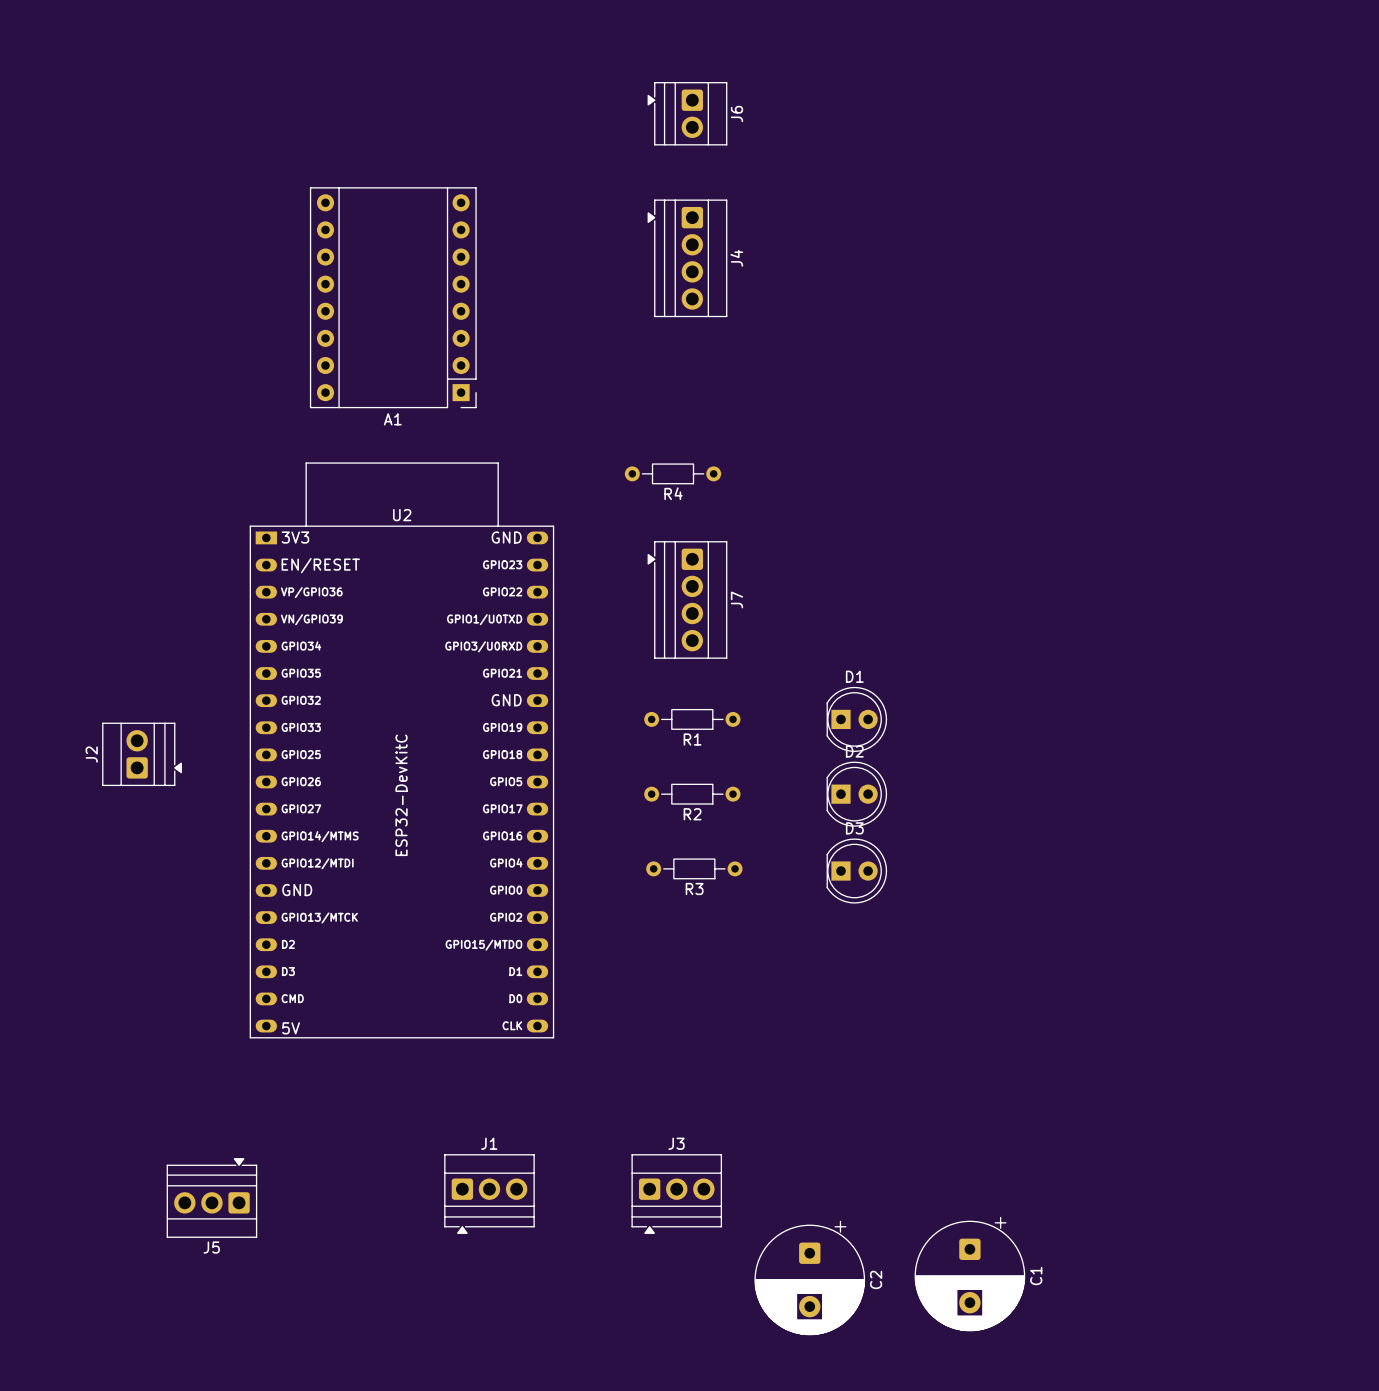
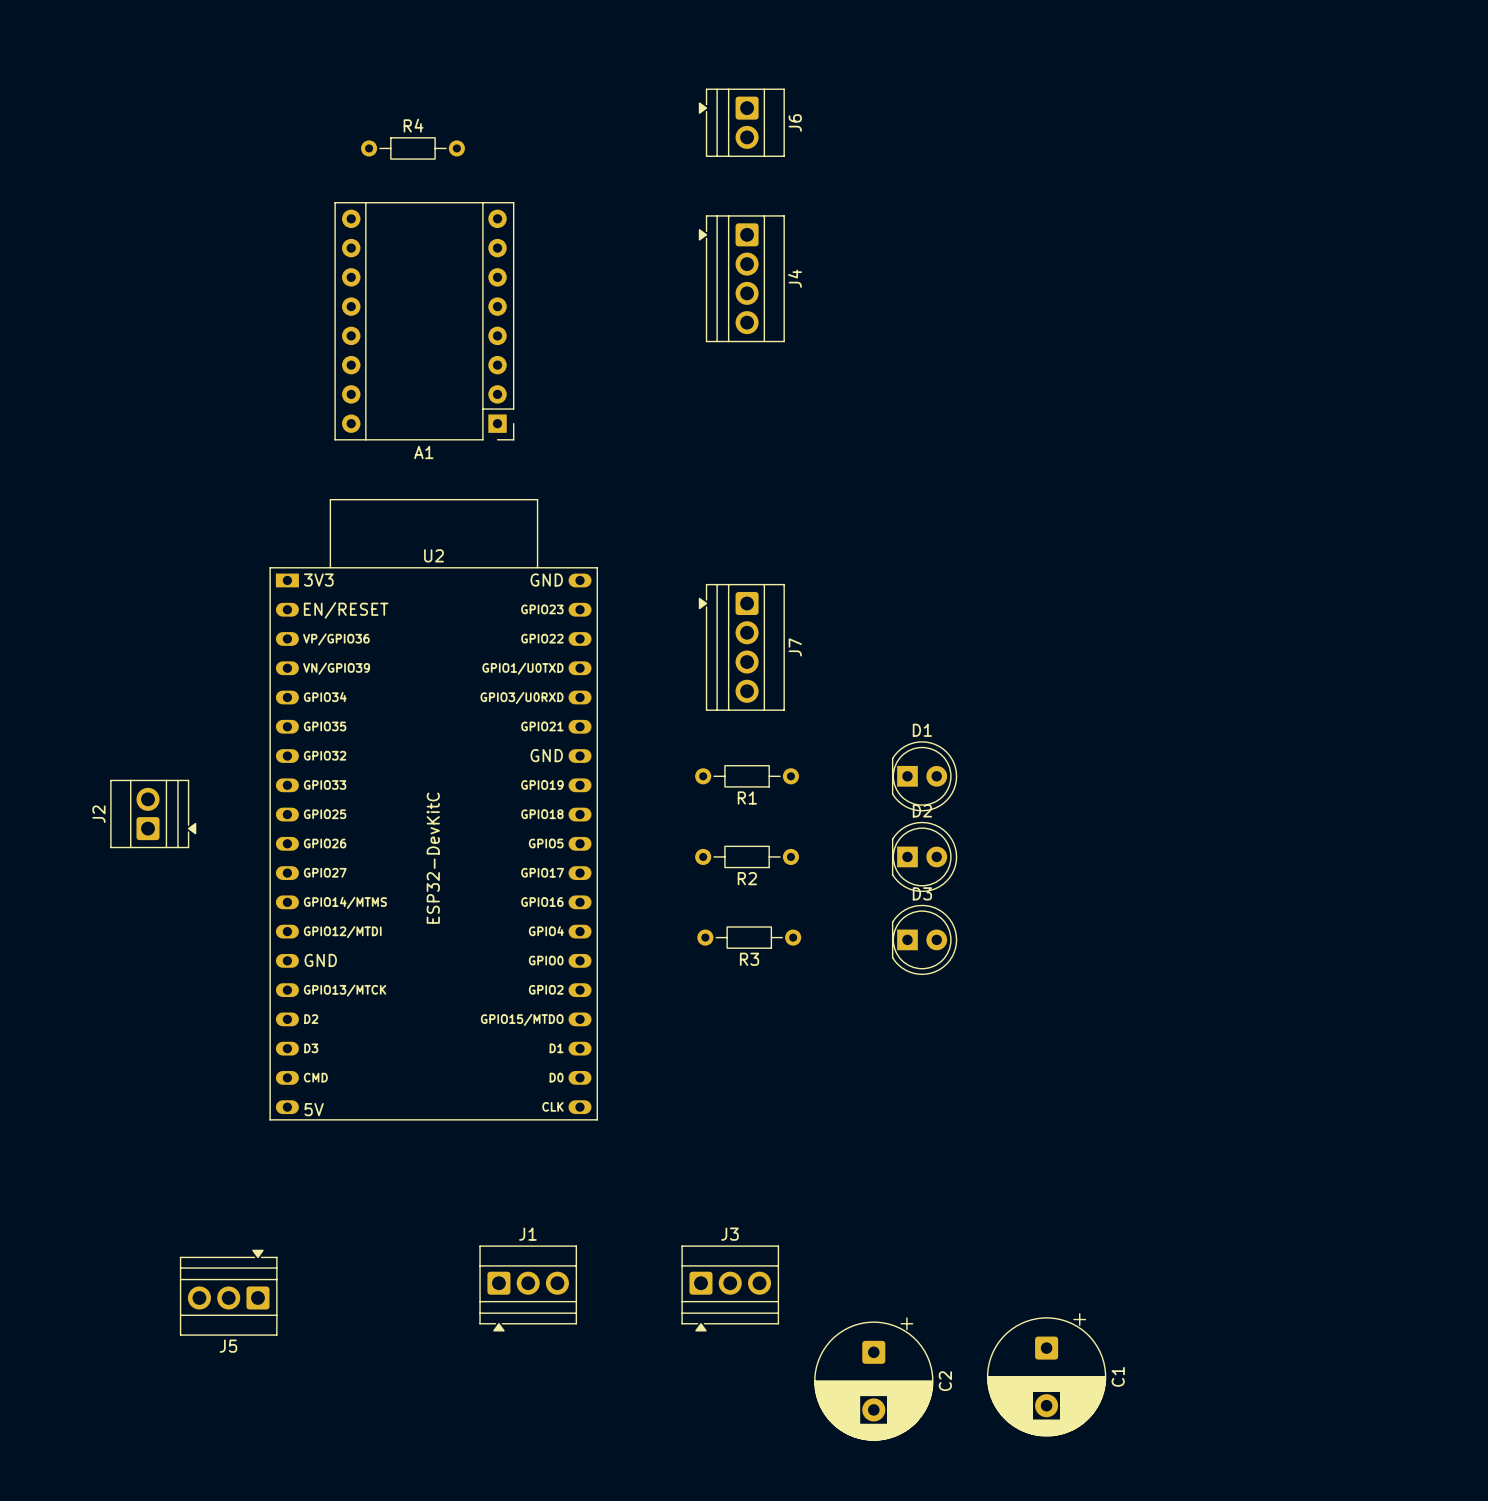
R4 position: (673, 473) -> (412, 148)
R4 name position: R4 (673, 493) -> R4 (413, 125)

